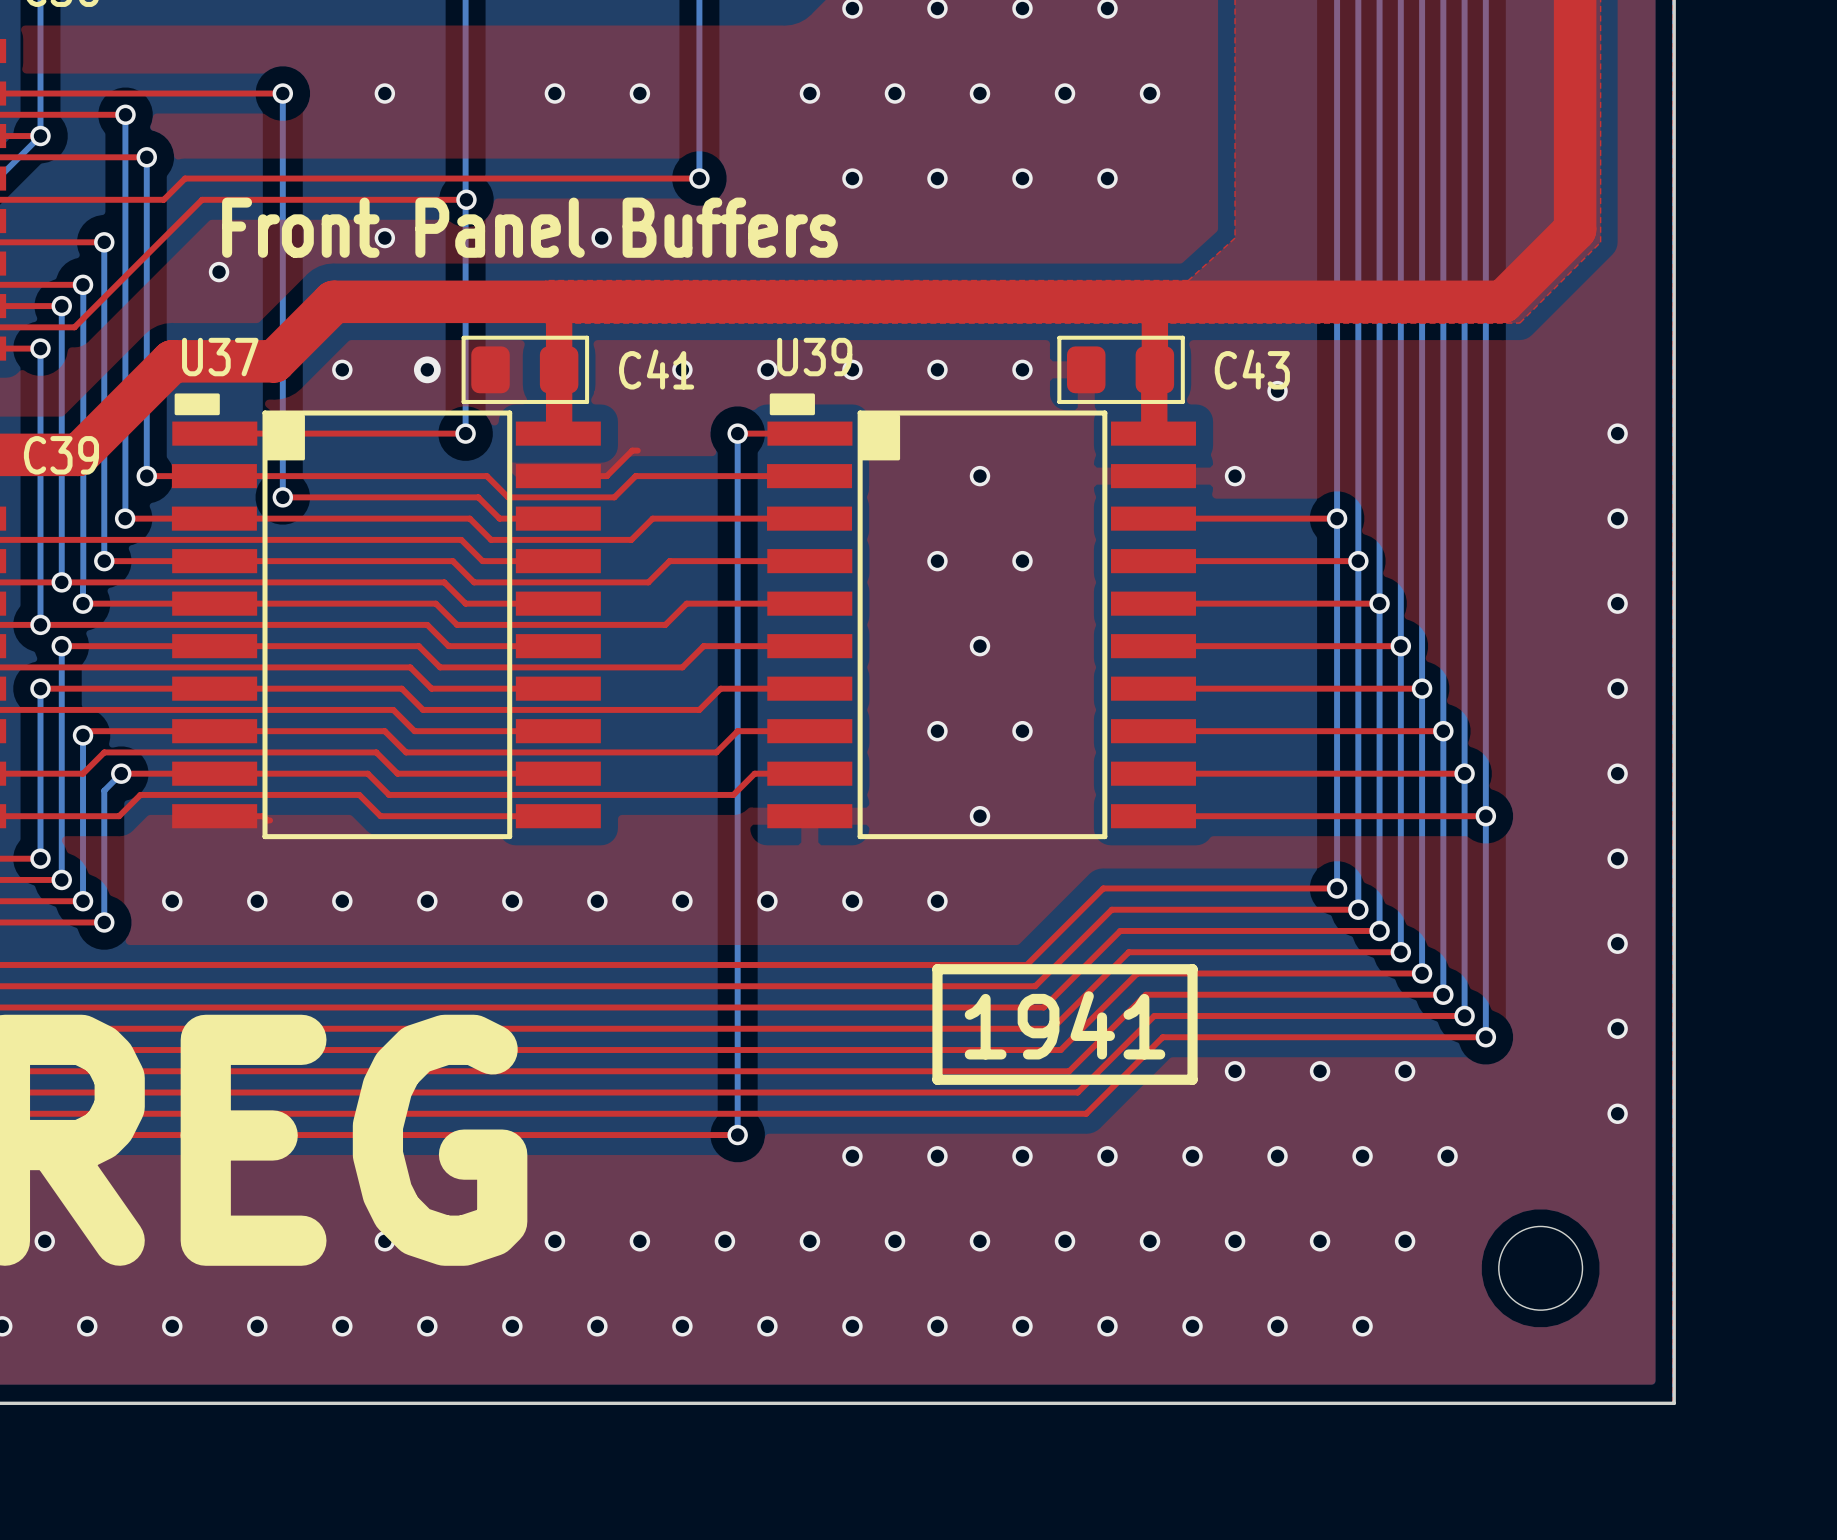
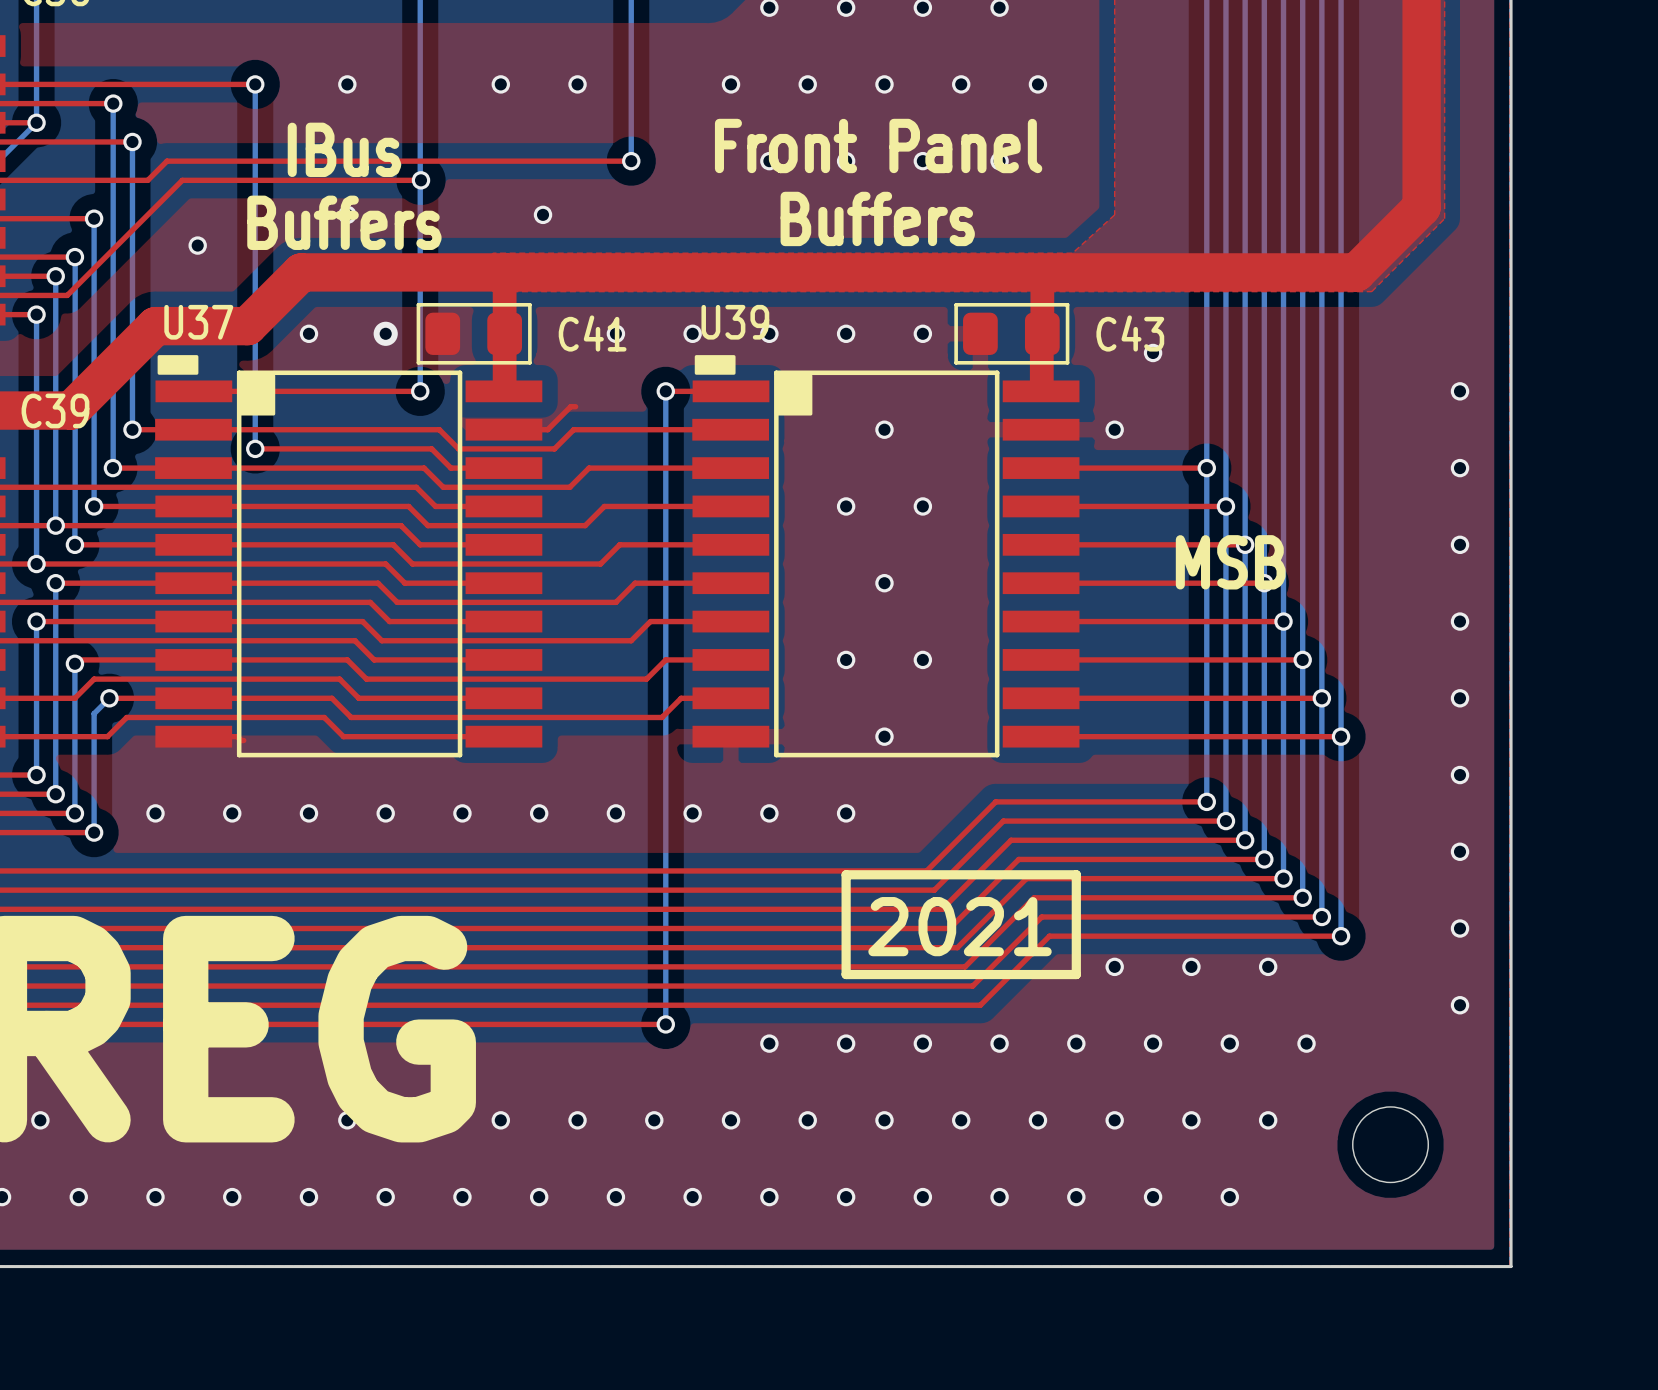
text: none -> IBus (344, 149)
text: Front Panel Buffers (529, 227) -> Front Panel (878, 145)
text: none -> Buffers (877, 218)
text: none -> Buffers (344, 222)
text: none -> MSB (1230, 562)
text: 1941 (1065, 1025) -> 2021 (960, 926)

